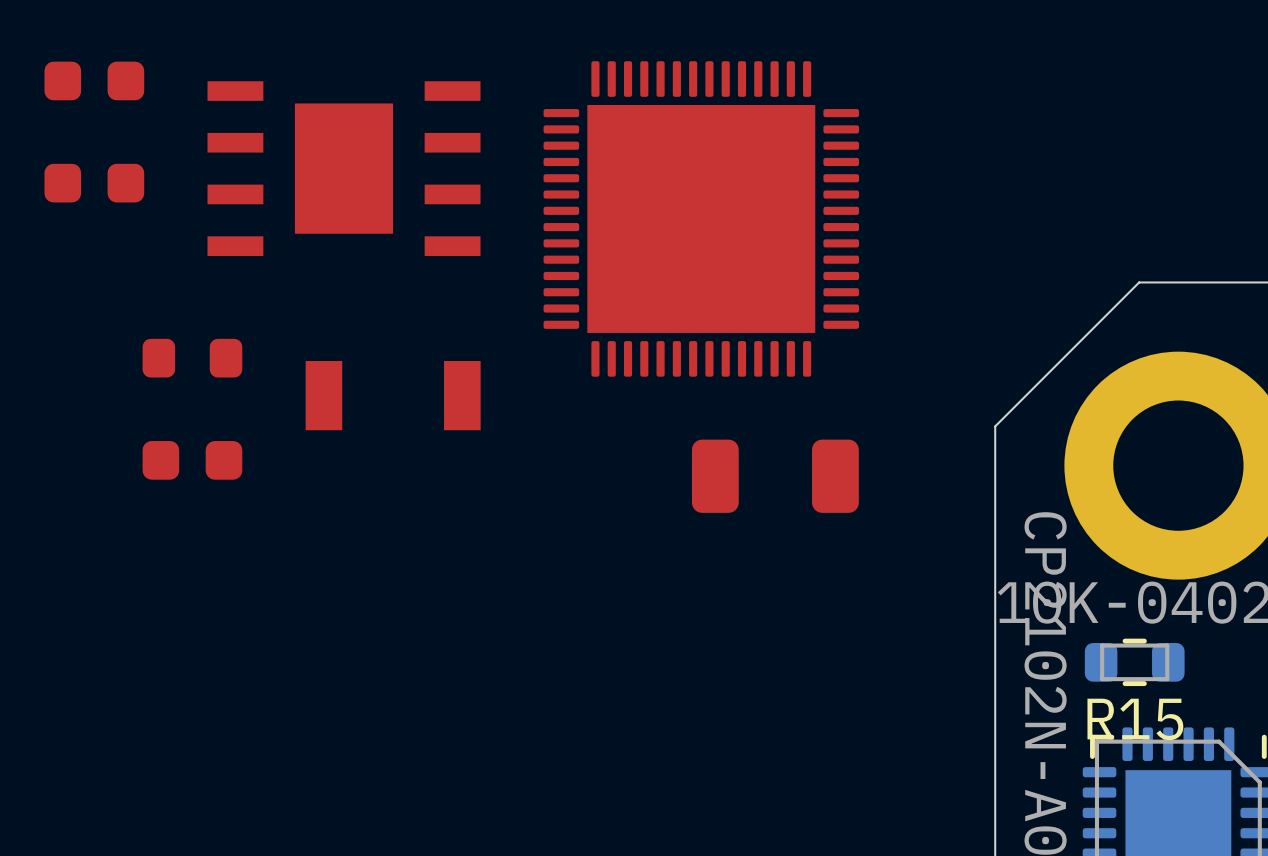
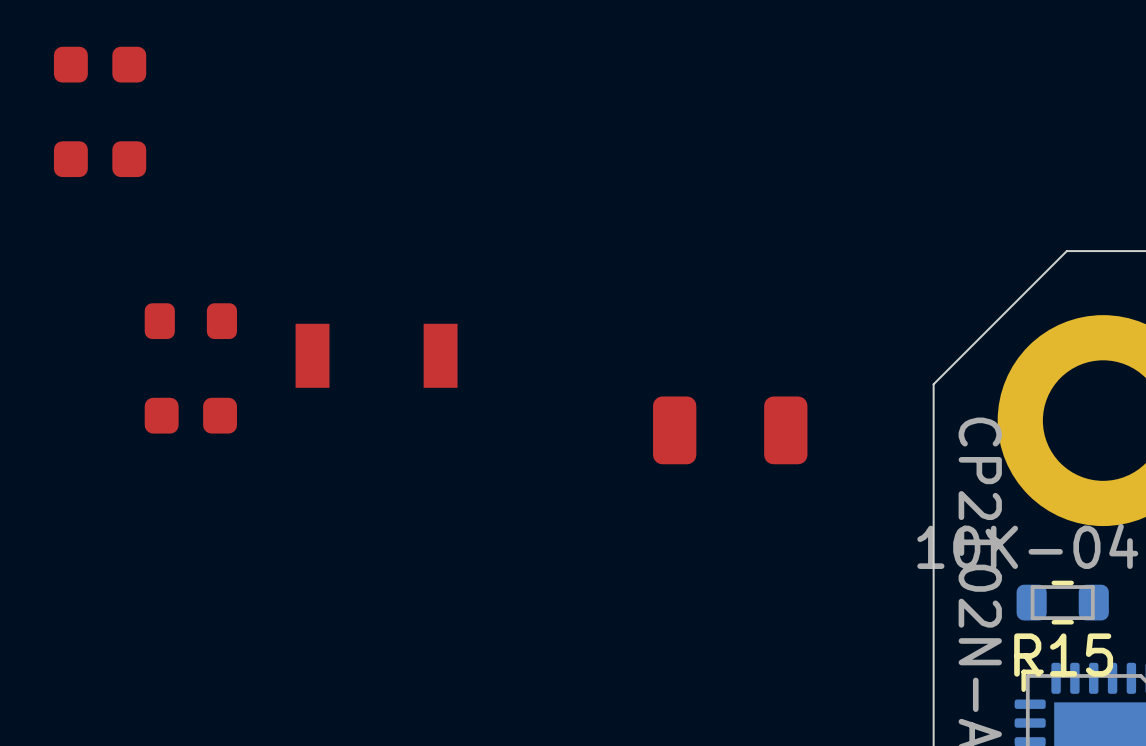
part: (344, 168) -> none
part: (701, 218) -> none

